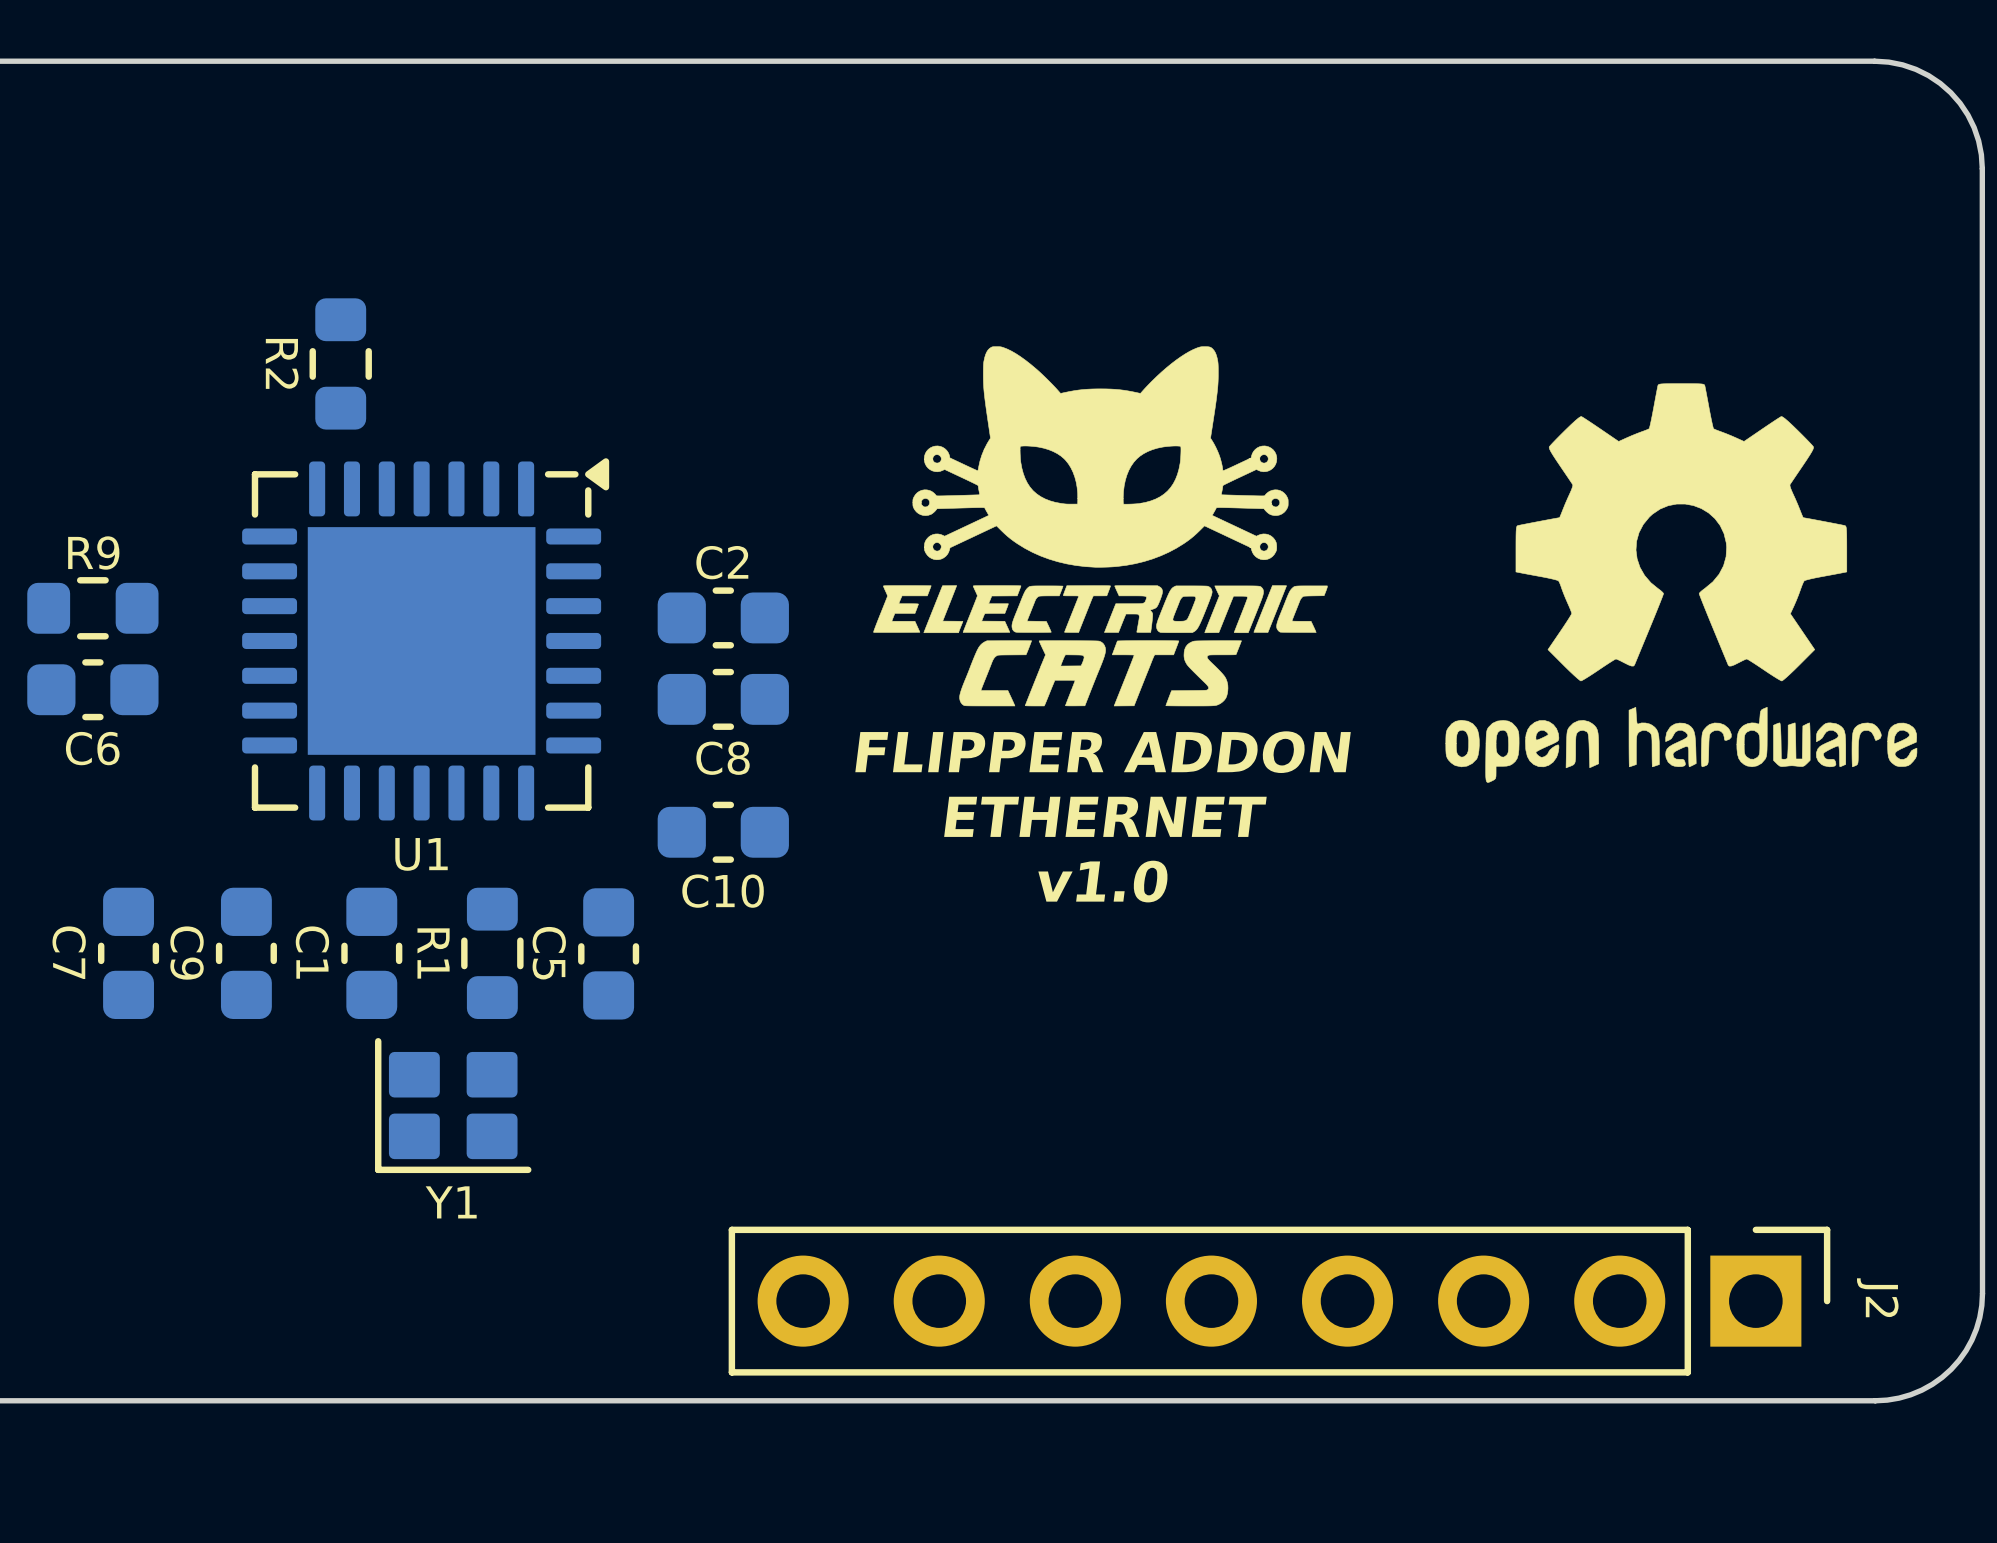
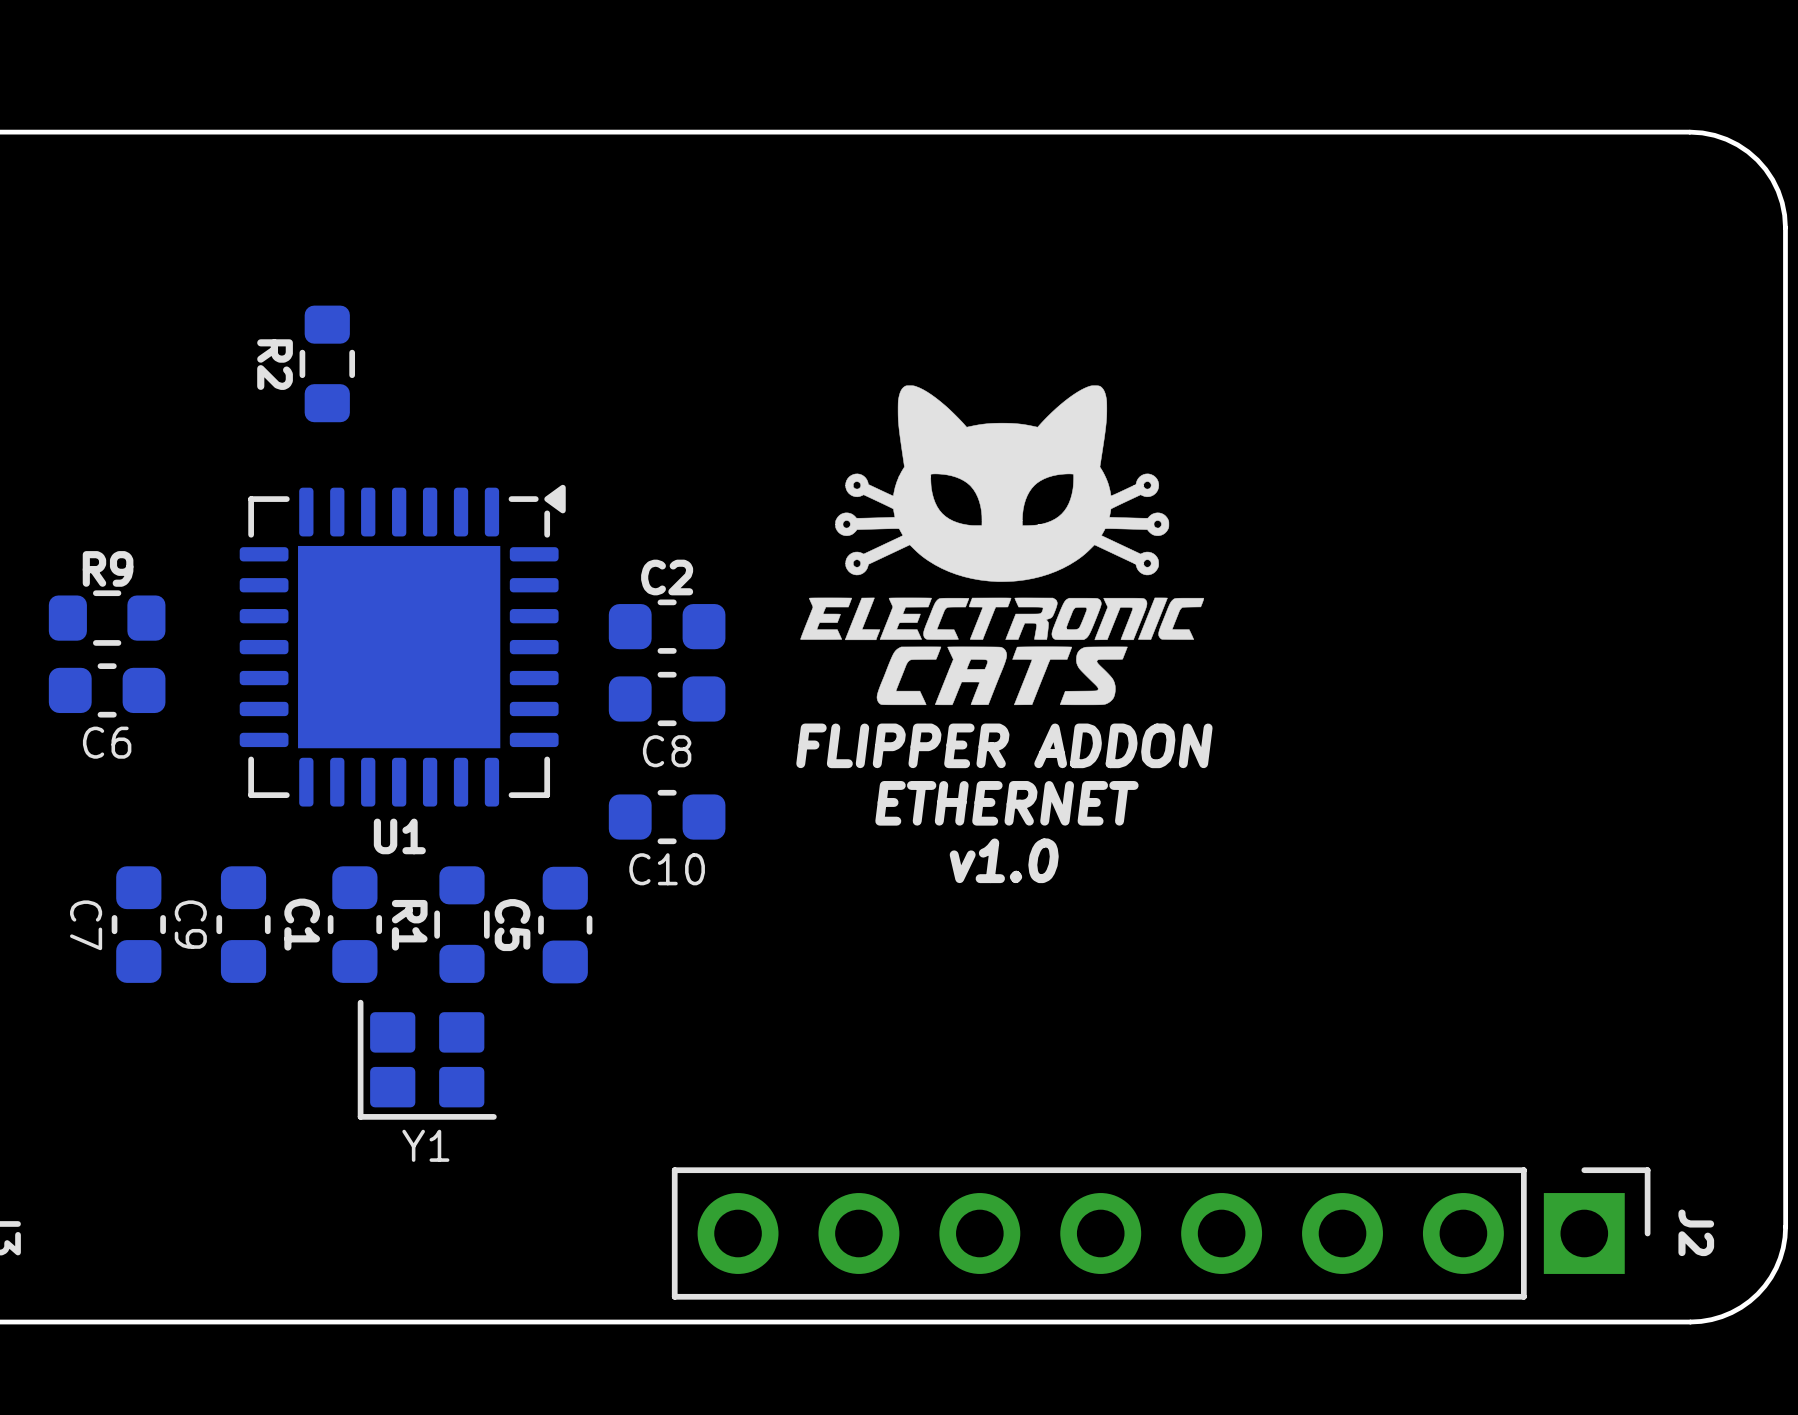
R2 position: (340, 363) -> (327, 363)
drawing: [1445, 383, 1918, 783] -> none

